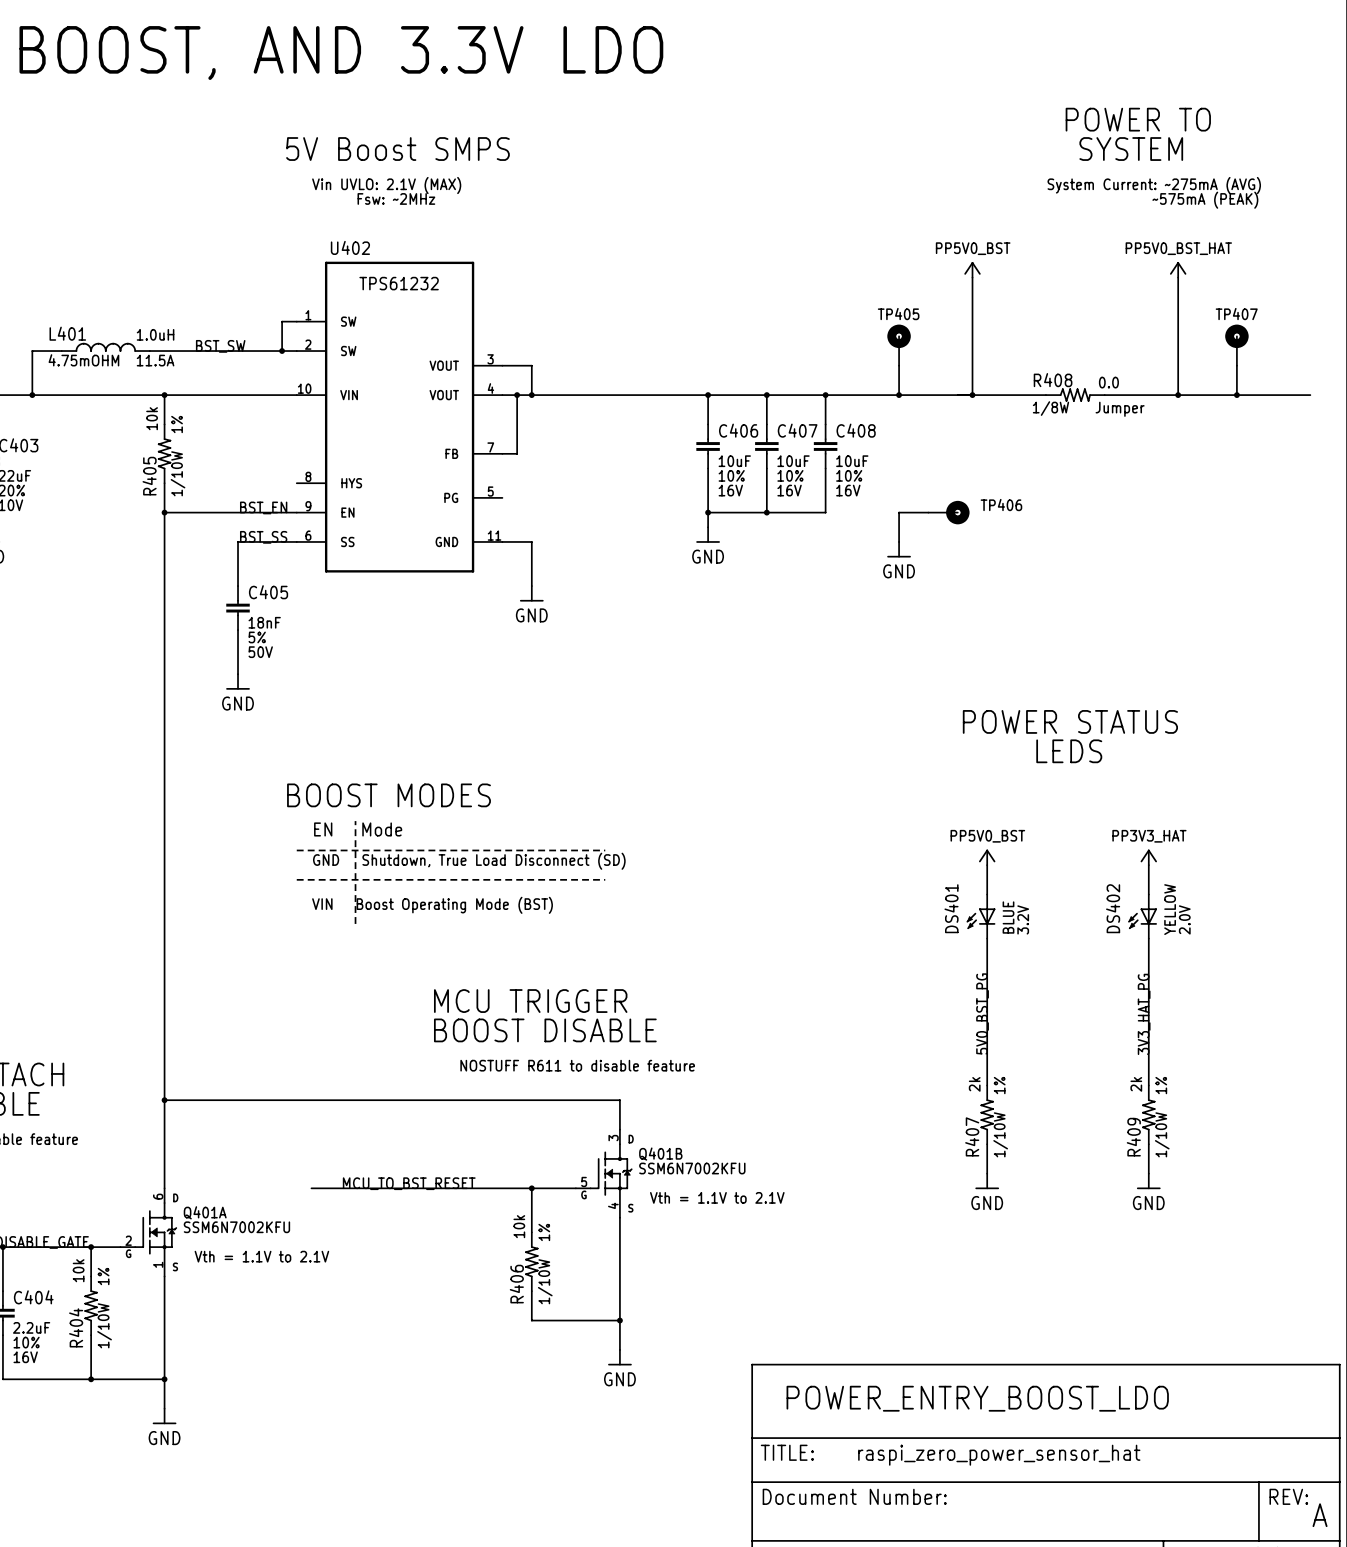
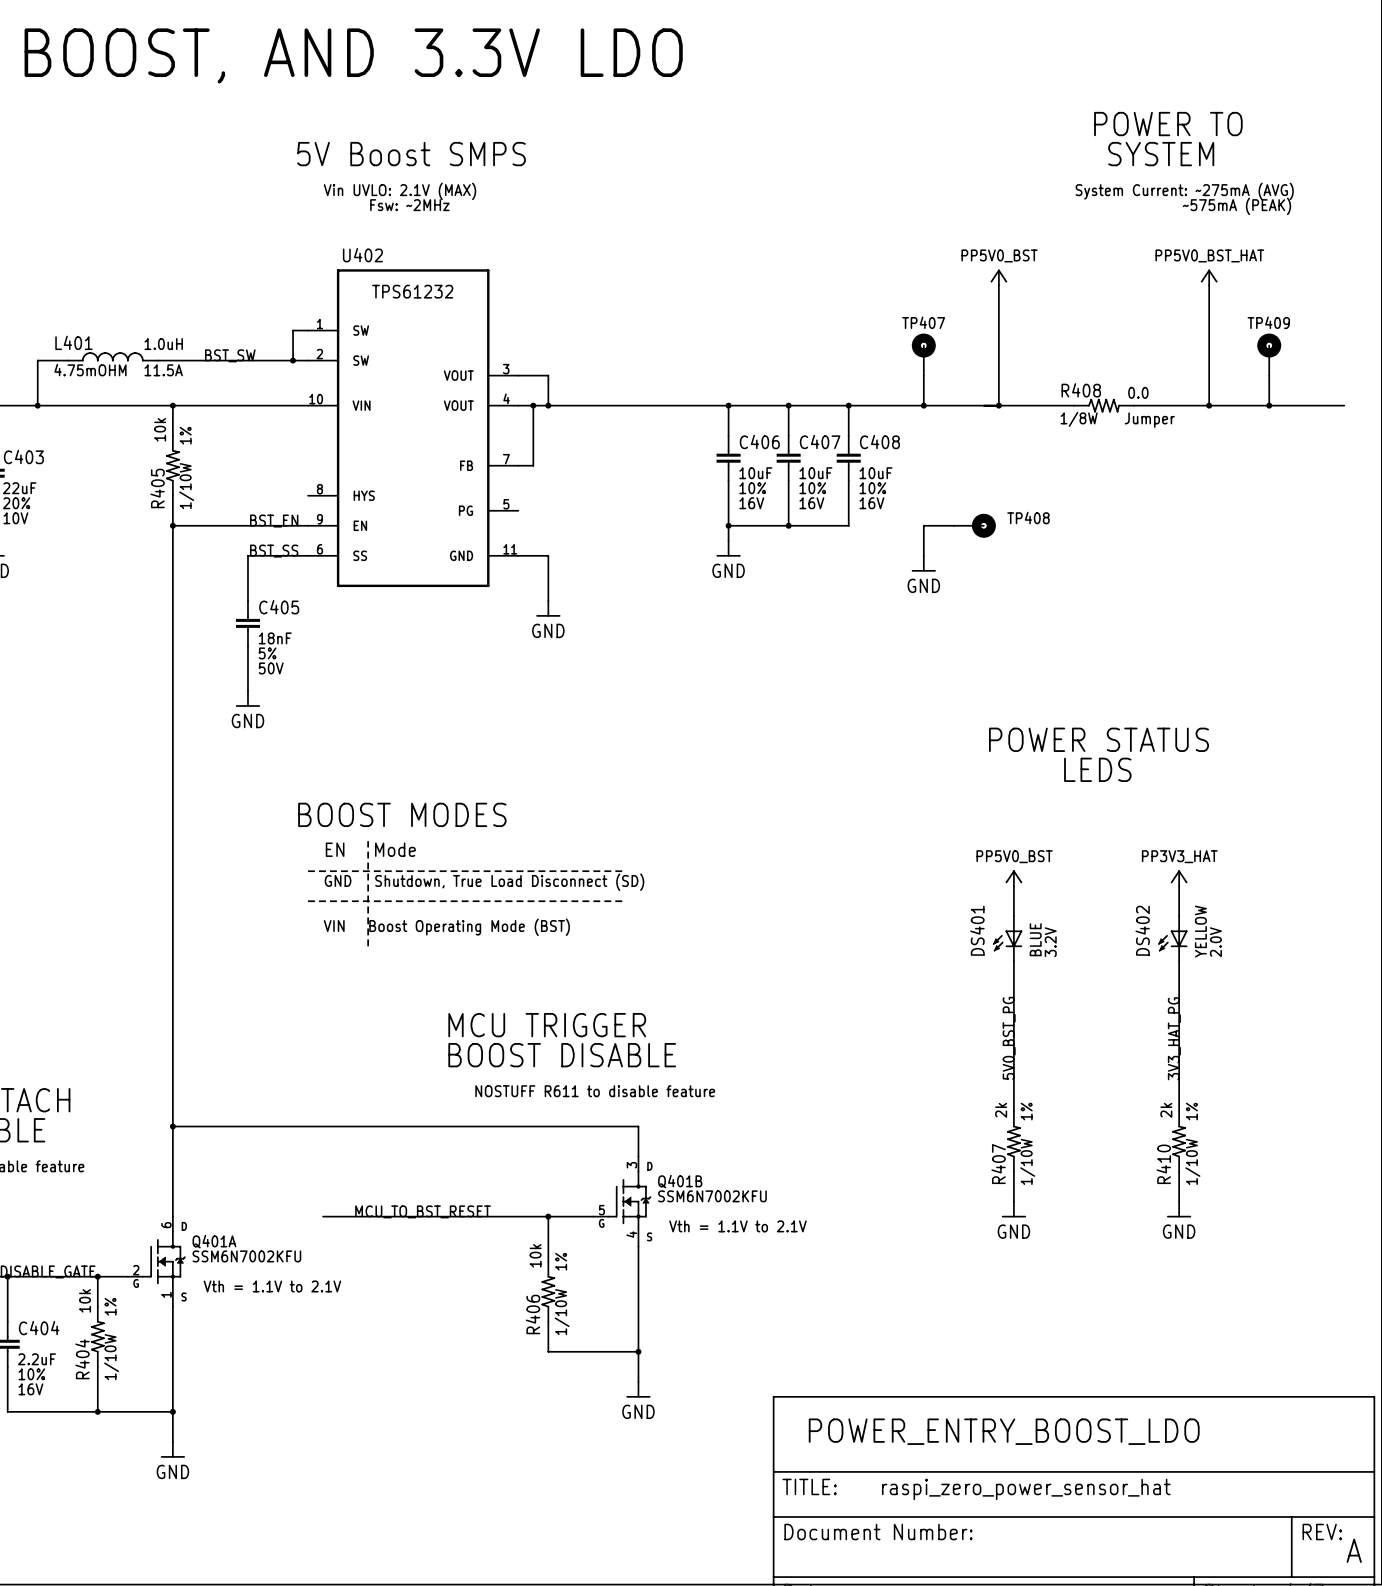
TP405 name: TP405 (898, 314) -> TP407 (923, 322)
TP407 name: TP407 (1236, 314) -> TP409 (1268, 322)
TP406 name: TP406 (1001, 505) -> TP408 (1028, 518)
R409 name: R409 (1133, 1137) -> R410 (1163, 1164)

